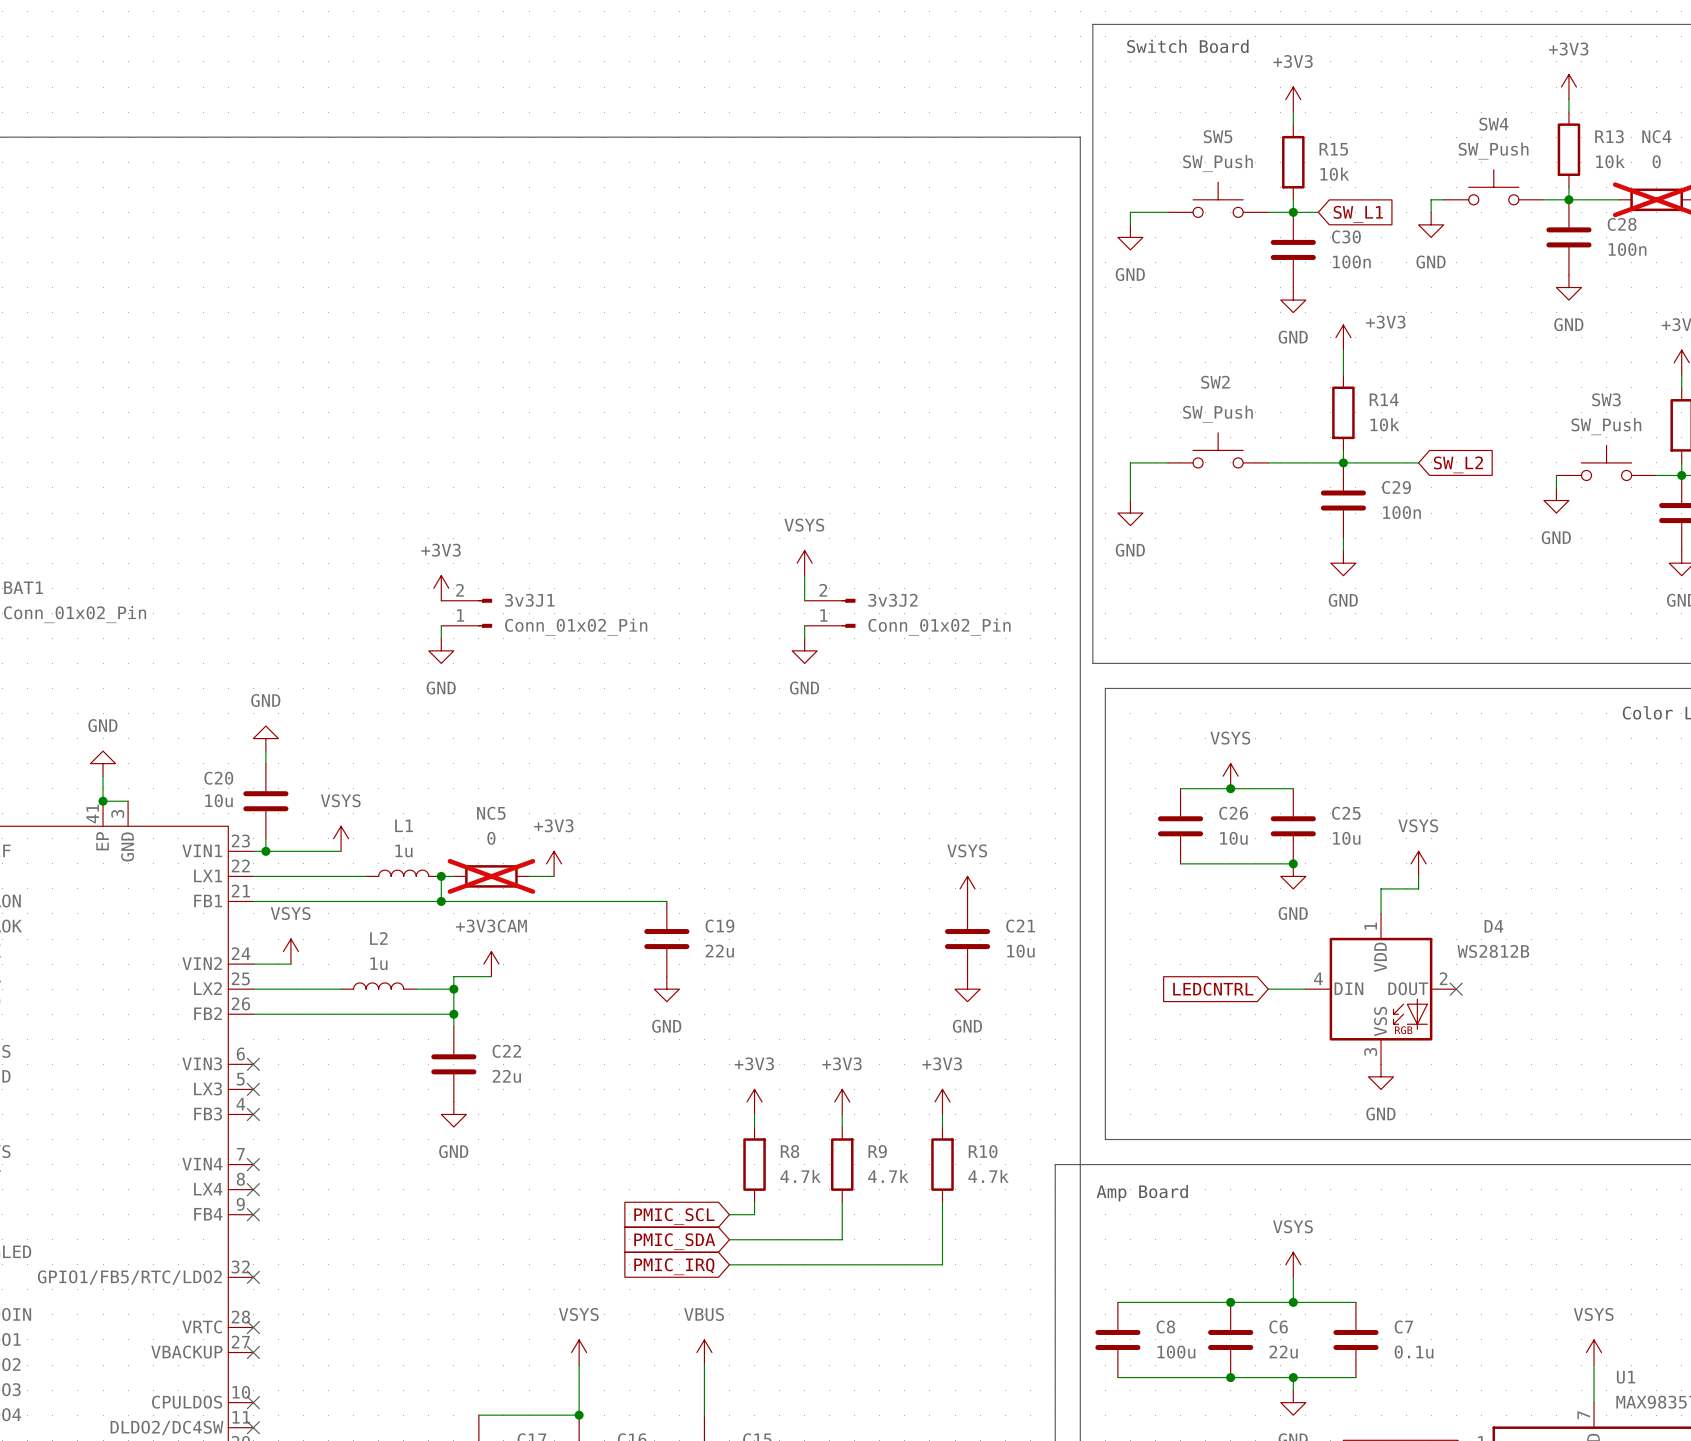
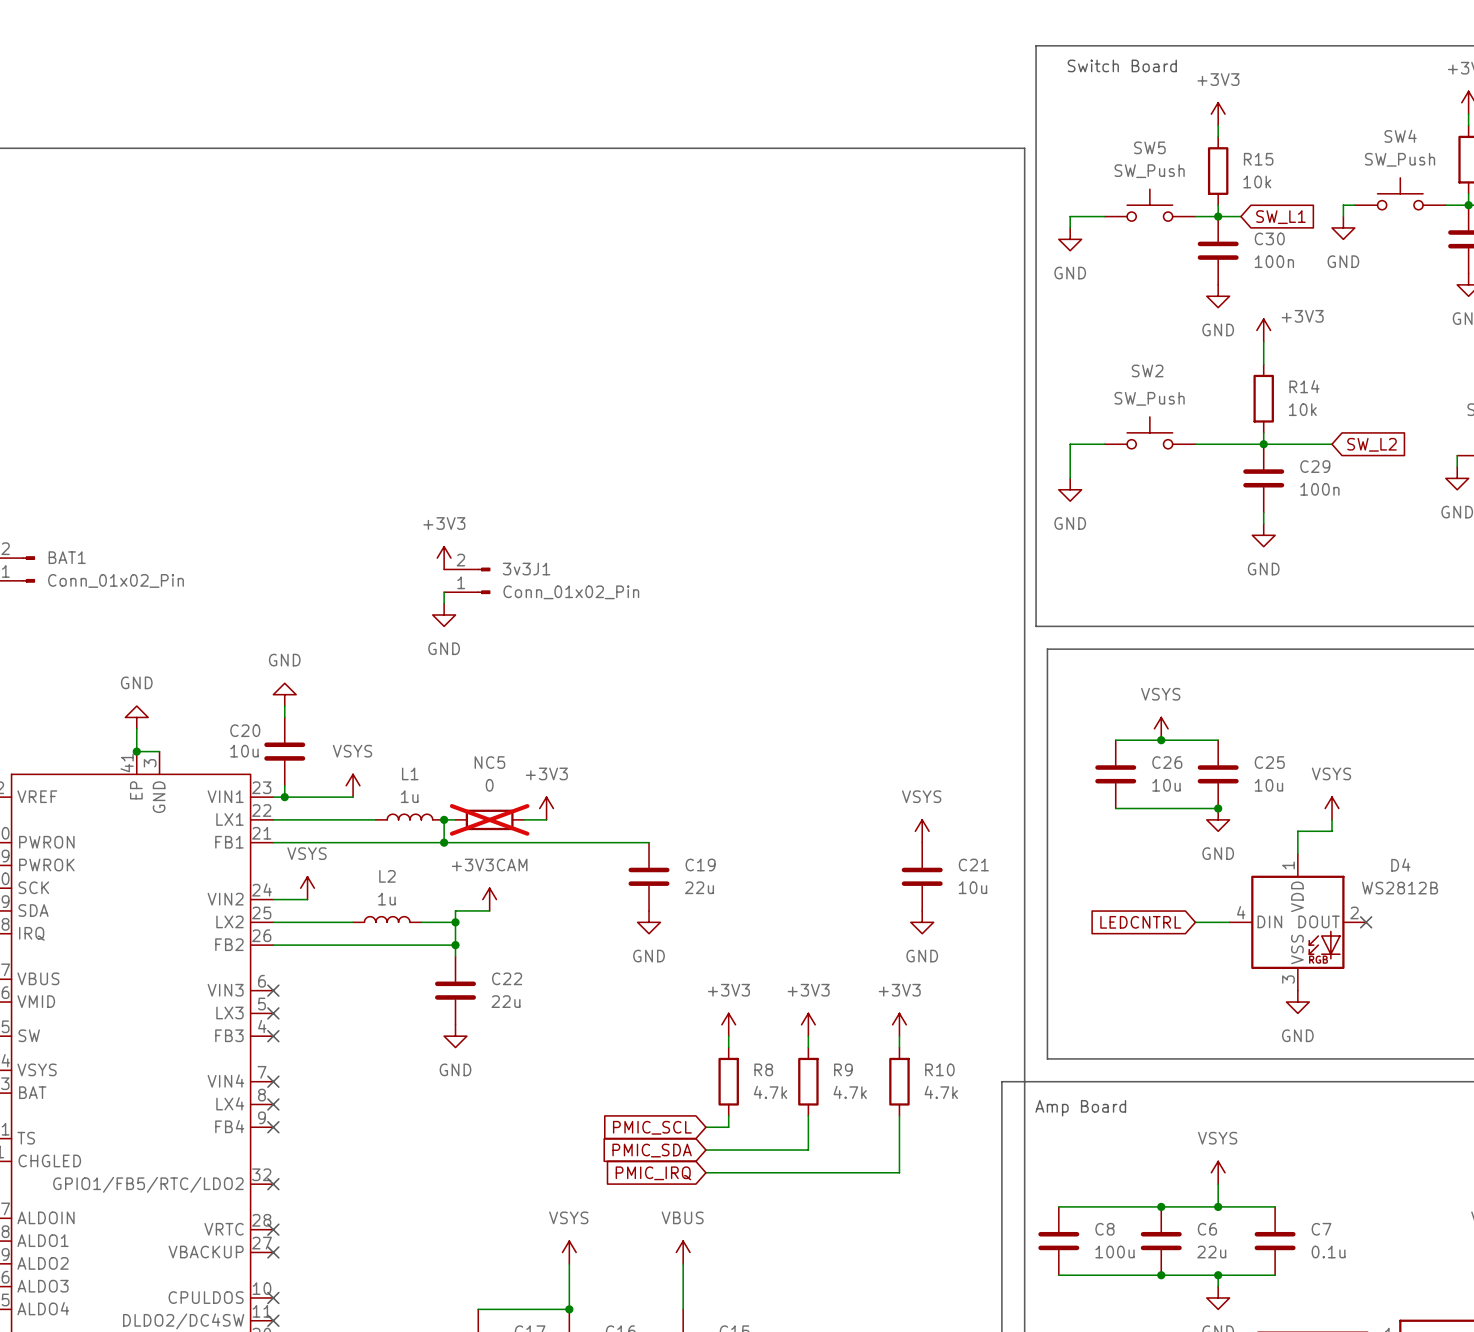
power symbol: VSYS (804, 563) -> none
wire: (804, 575) (804, 600) -> none
3v3J2: Conn_01x02_Pin (830, 613) -> none
wire: (804, 625) (804, 638) -> none
power symbol: GND (804, 650) -> none

